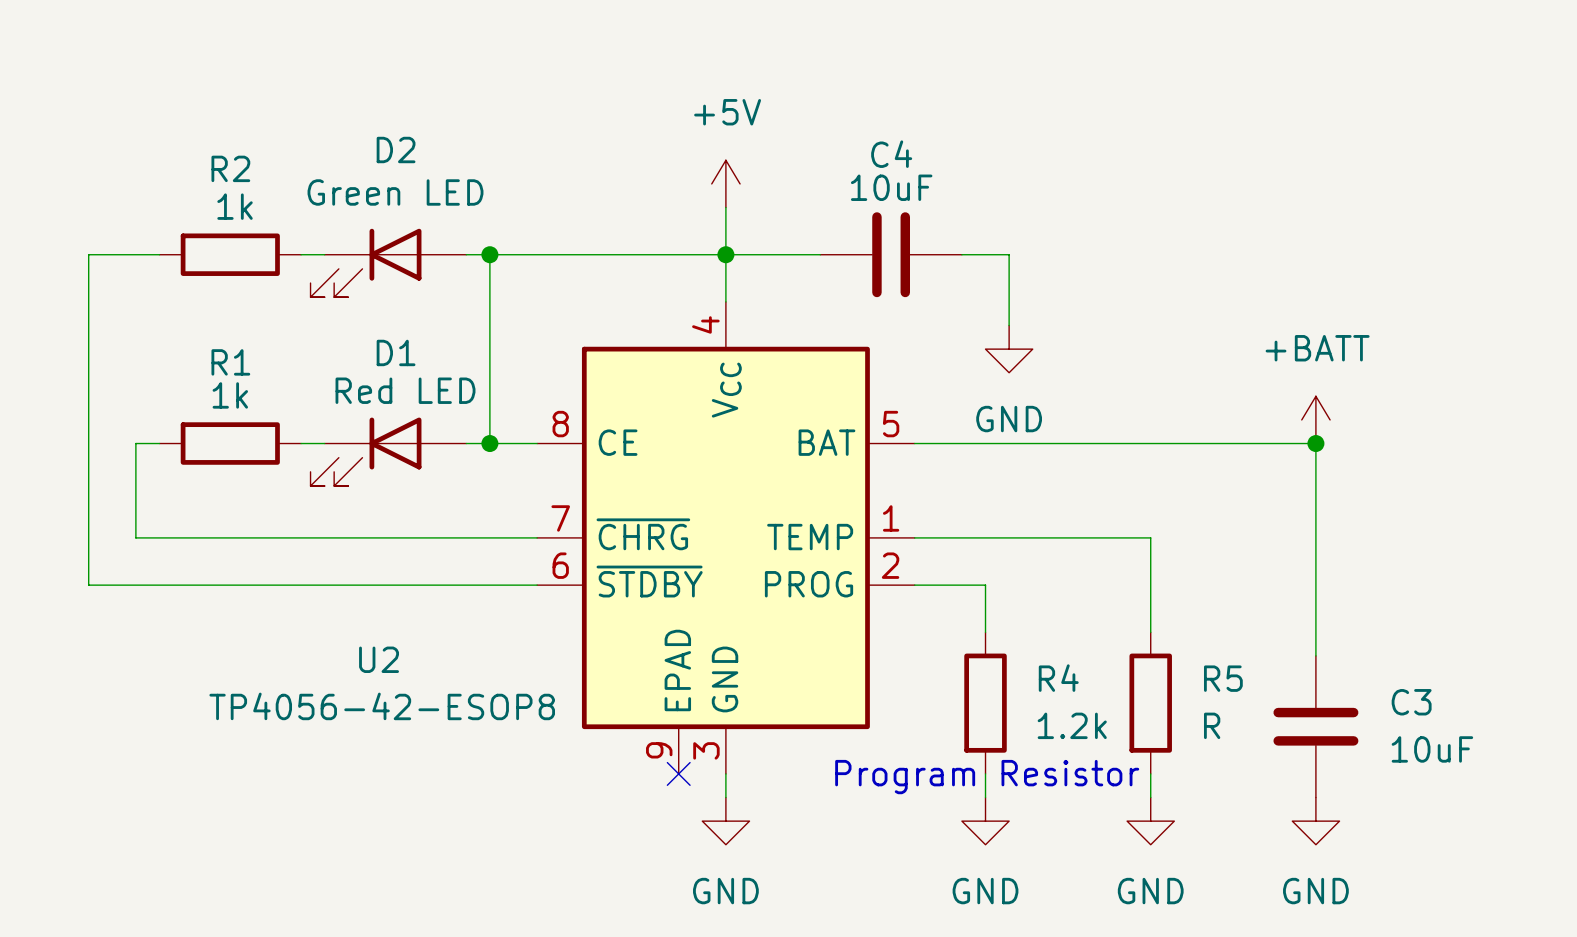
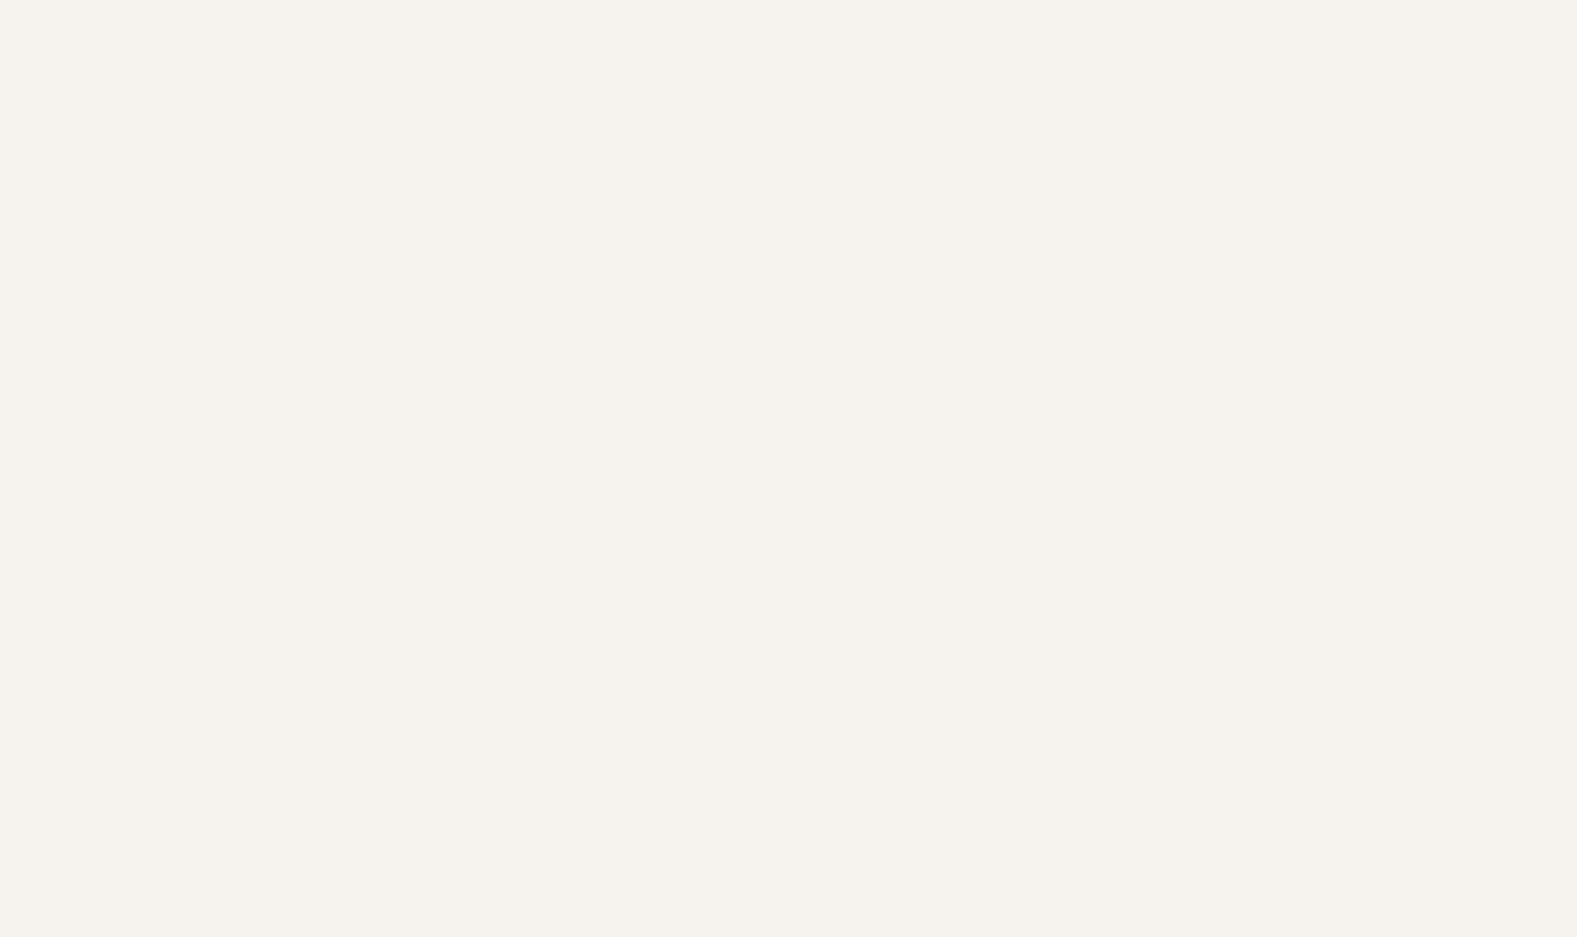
power symbol: +5V (725, 183) -> none
wire: (725, 207) (725, 301) -> none
wire: (159, 254) (88, 254) (88, 585) (537, 585) -> none
R2: 1k (230, 254) -> none
wire: (301, 254) (324, 254) -> none
wire: (466, 254) (820, 254) -> none
wire: (489, 254) (489, 443) -> none
junction: (489, 254) -> none
junction: (725, 254) -> none
C4: 10uF (891, 254) -> none
wire: (961, 254) (1009, 254) (1009, 325) -> none
D2: Green LED (388, 262) -> none
power symbol: GND (1009, 349) -> none
power symbol: +BATT (1315, 419) -> none
wire: (159, 443) (135, 443) (135, 537) (537, 537) -> none
R1: 1k (230, 443) -> none
wire: (301, 443) (324, 443) -> none
wire: (466, 443) (537, 443) -> none
junction: (489, 443) -> none
wire: (914, 443) (1315, 443) (1315, 655) -> none
junction: (1315, 443) -> none
D1: Red LED (388, 451) -> none
U2: TP4056-42-ESOP8 (725, 537) -> none
wire: (914, 537) (1150, 537) (1150, 632) -> none
wire: (914, 585) (985, 585) (985, 632) -> none
R4: 1.2k (985, 703) -> none
R5: R (1150, 703) -> none
C3: 10uF (1315, 726) -> none
no-connect mark: (678, 773) -> none
wire: (725, 773) (725, 797) -> none
wire: (985, 773) (985, 797) -> none
wire: (1150, 773) (1150, 797) -> none
text: Program Resistor (987, 777) -> none
power symbol: GND (725, 821) -> none
power symbol: GND (985, 821) -> none
power symbol: GND (1150, 821) -> none
power symbol: GND (1315, 821) -> none

